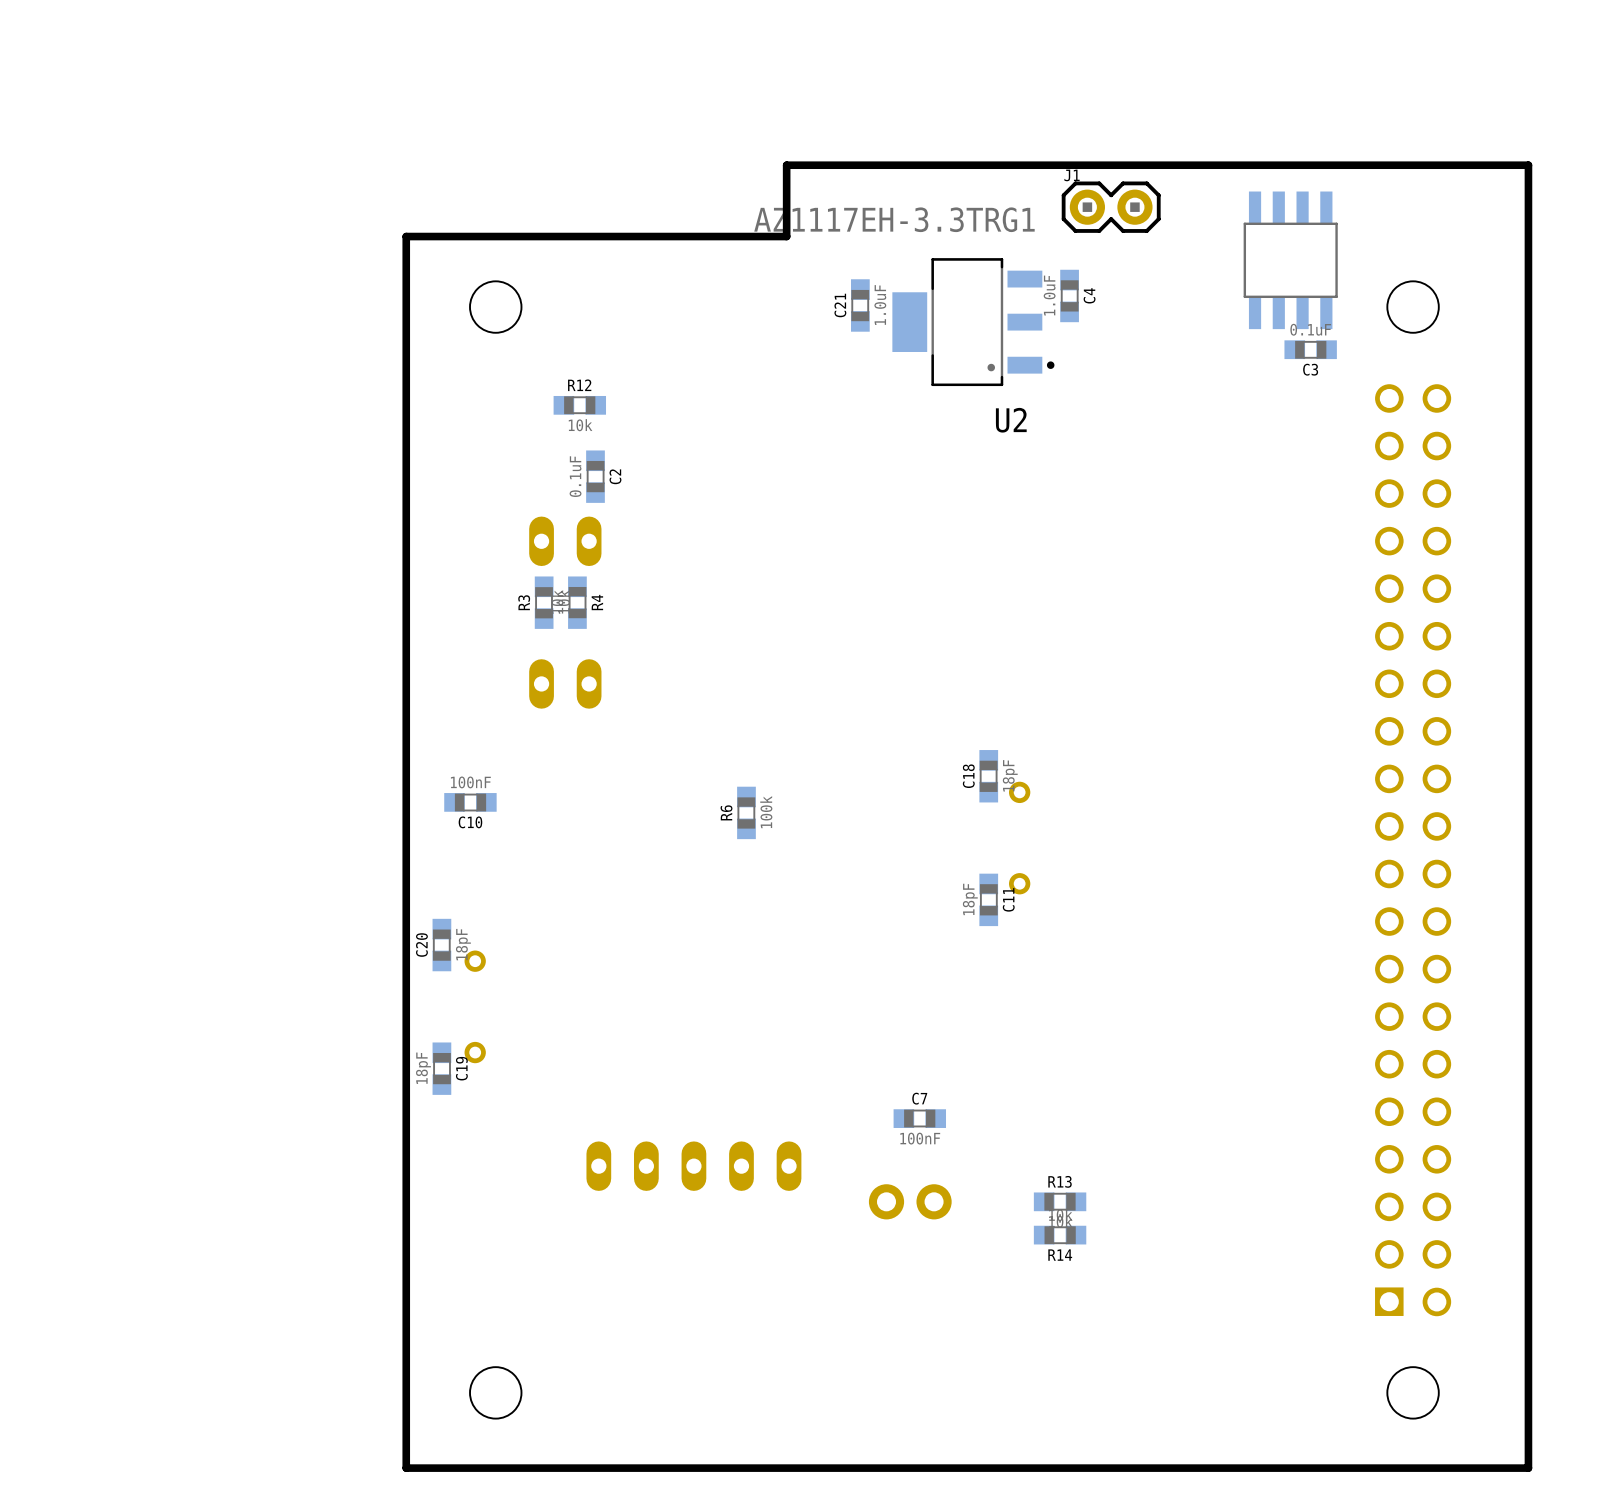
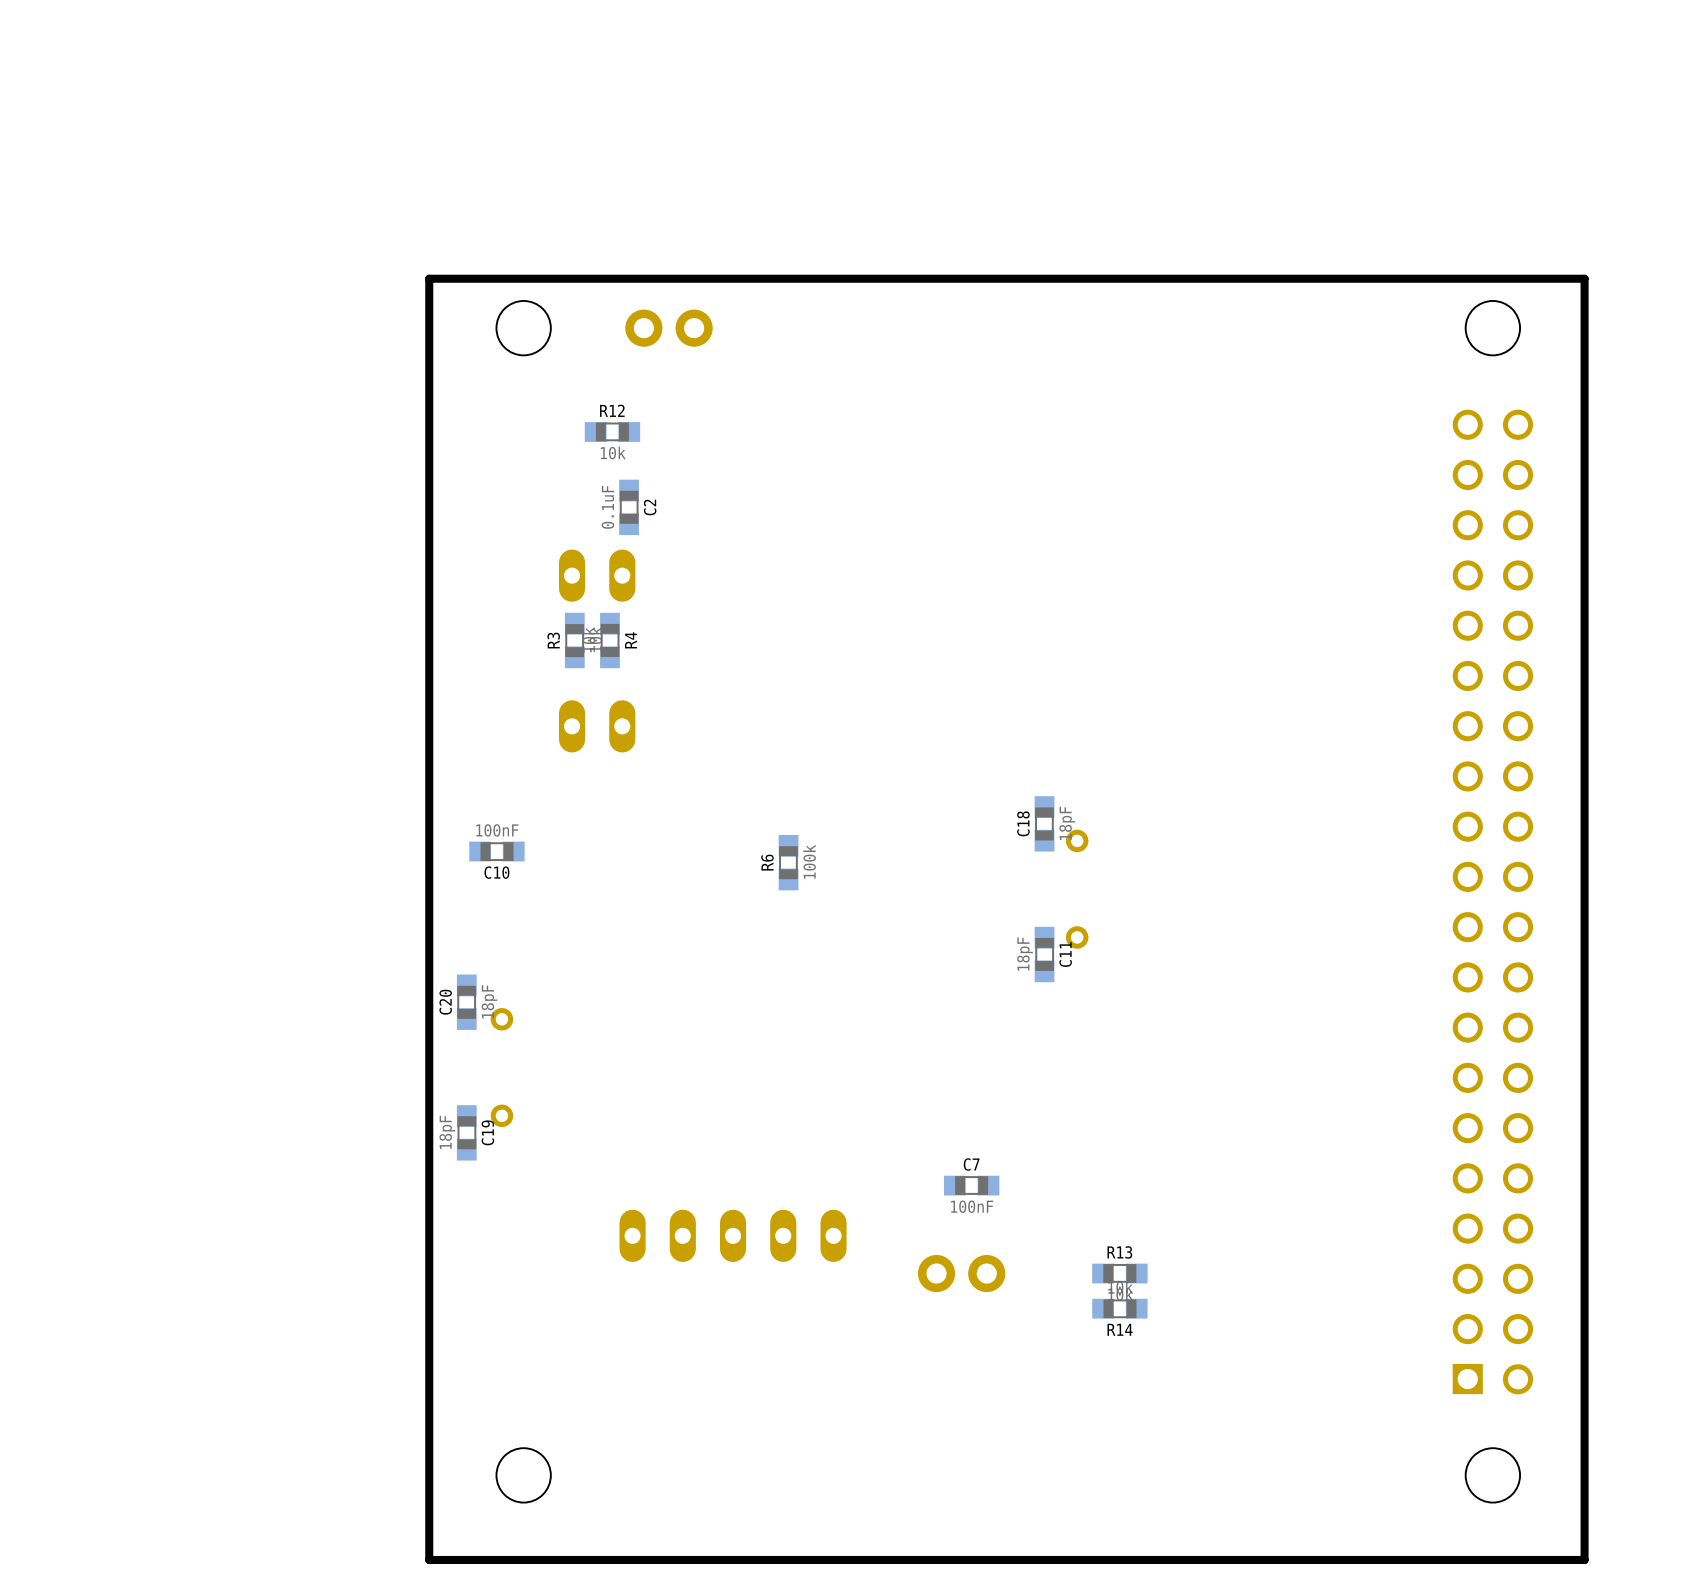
board edge: (1528, 165) (786, 165) (786, 236) (406, 236) (406, 1468) (1528, 1468) (1528, 165) -> (1584, 278) (1584, 1559) (429, 1559) (429, 278) (1584, 278)
J1: (1111, 207) -> none
part: (1290, 260) -> none
C4: 1.0uF (1069, 295) -> none
C21: 1.0uF (860, 305) -> none
part: none -> (669, 328)
U2: AZ1117EH-3.3TRG1 (973, 322) -> none
C3: 0.1uF (1310, 349) -> none

